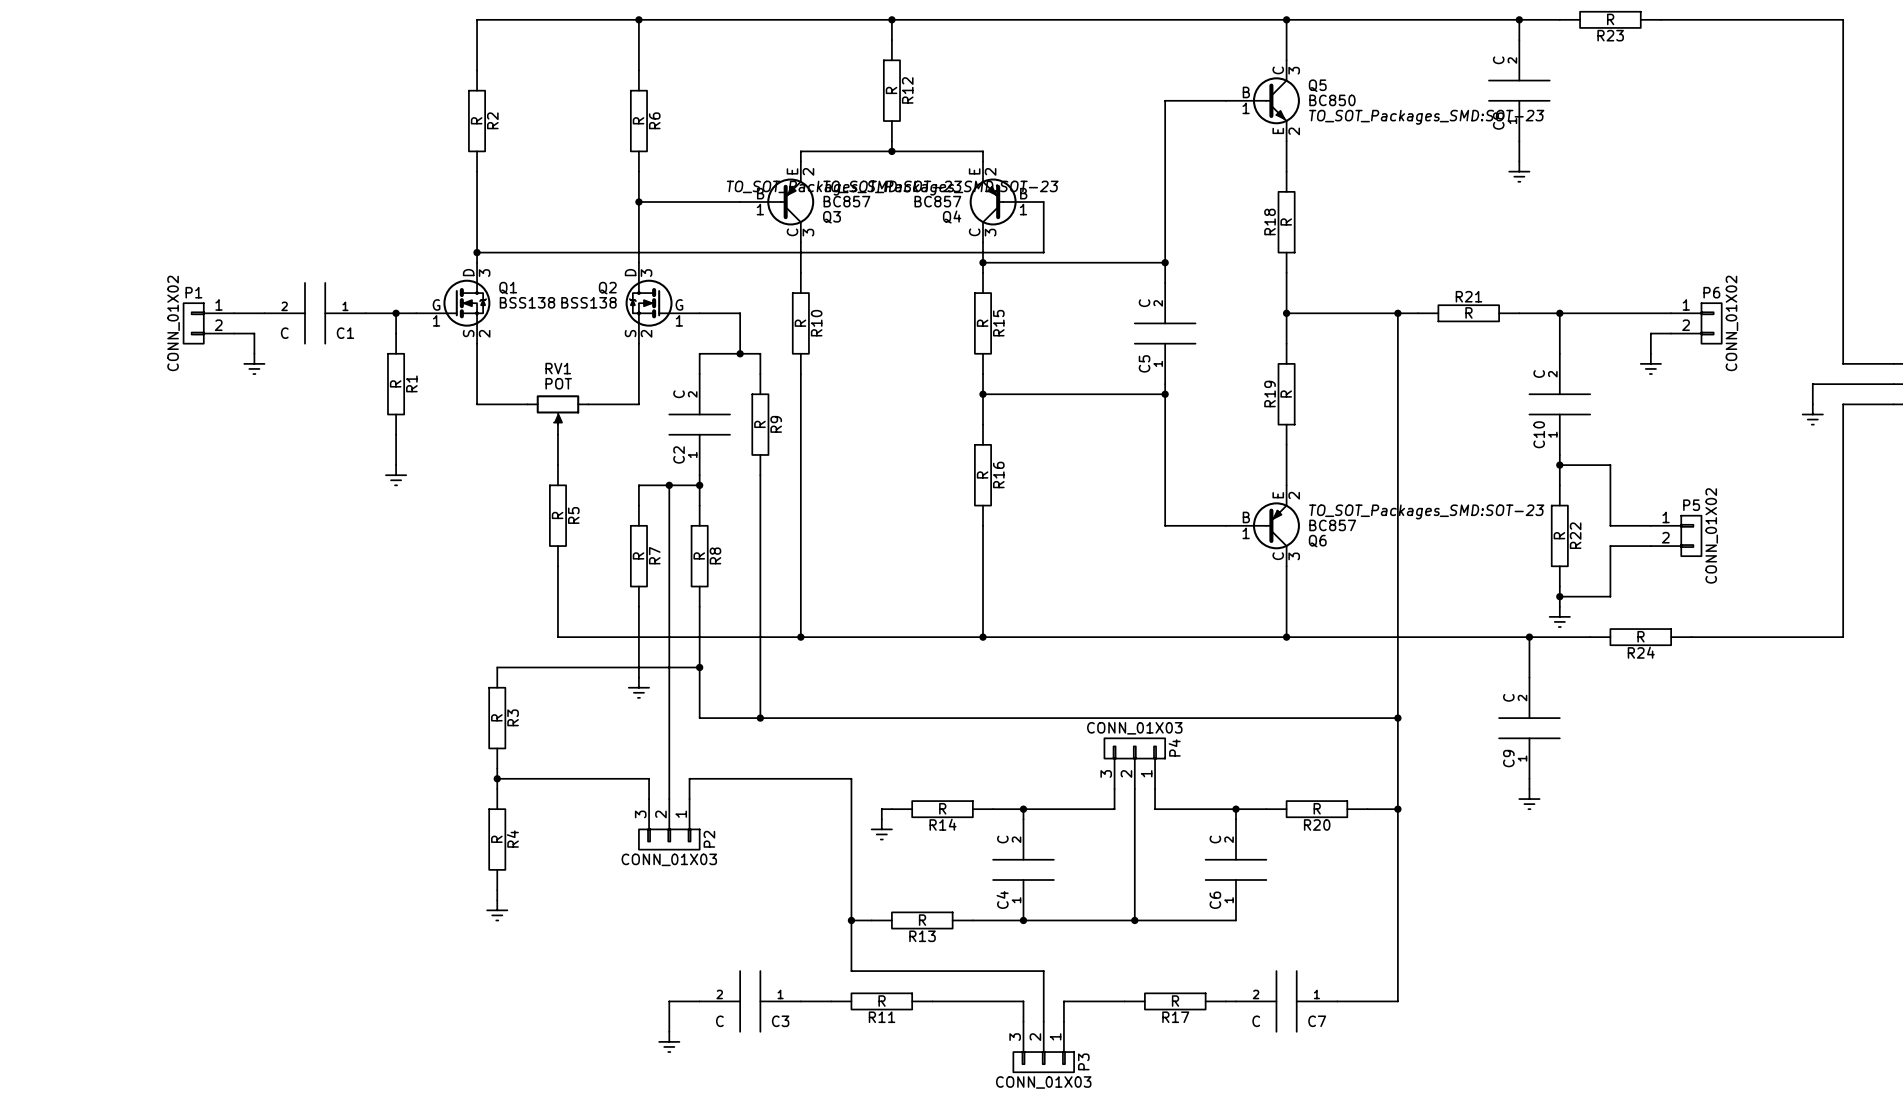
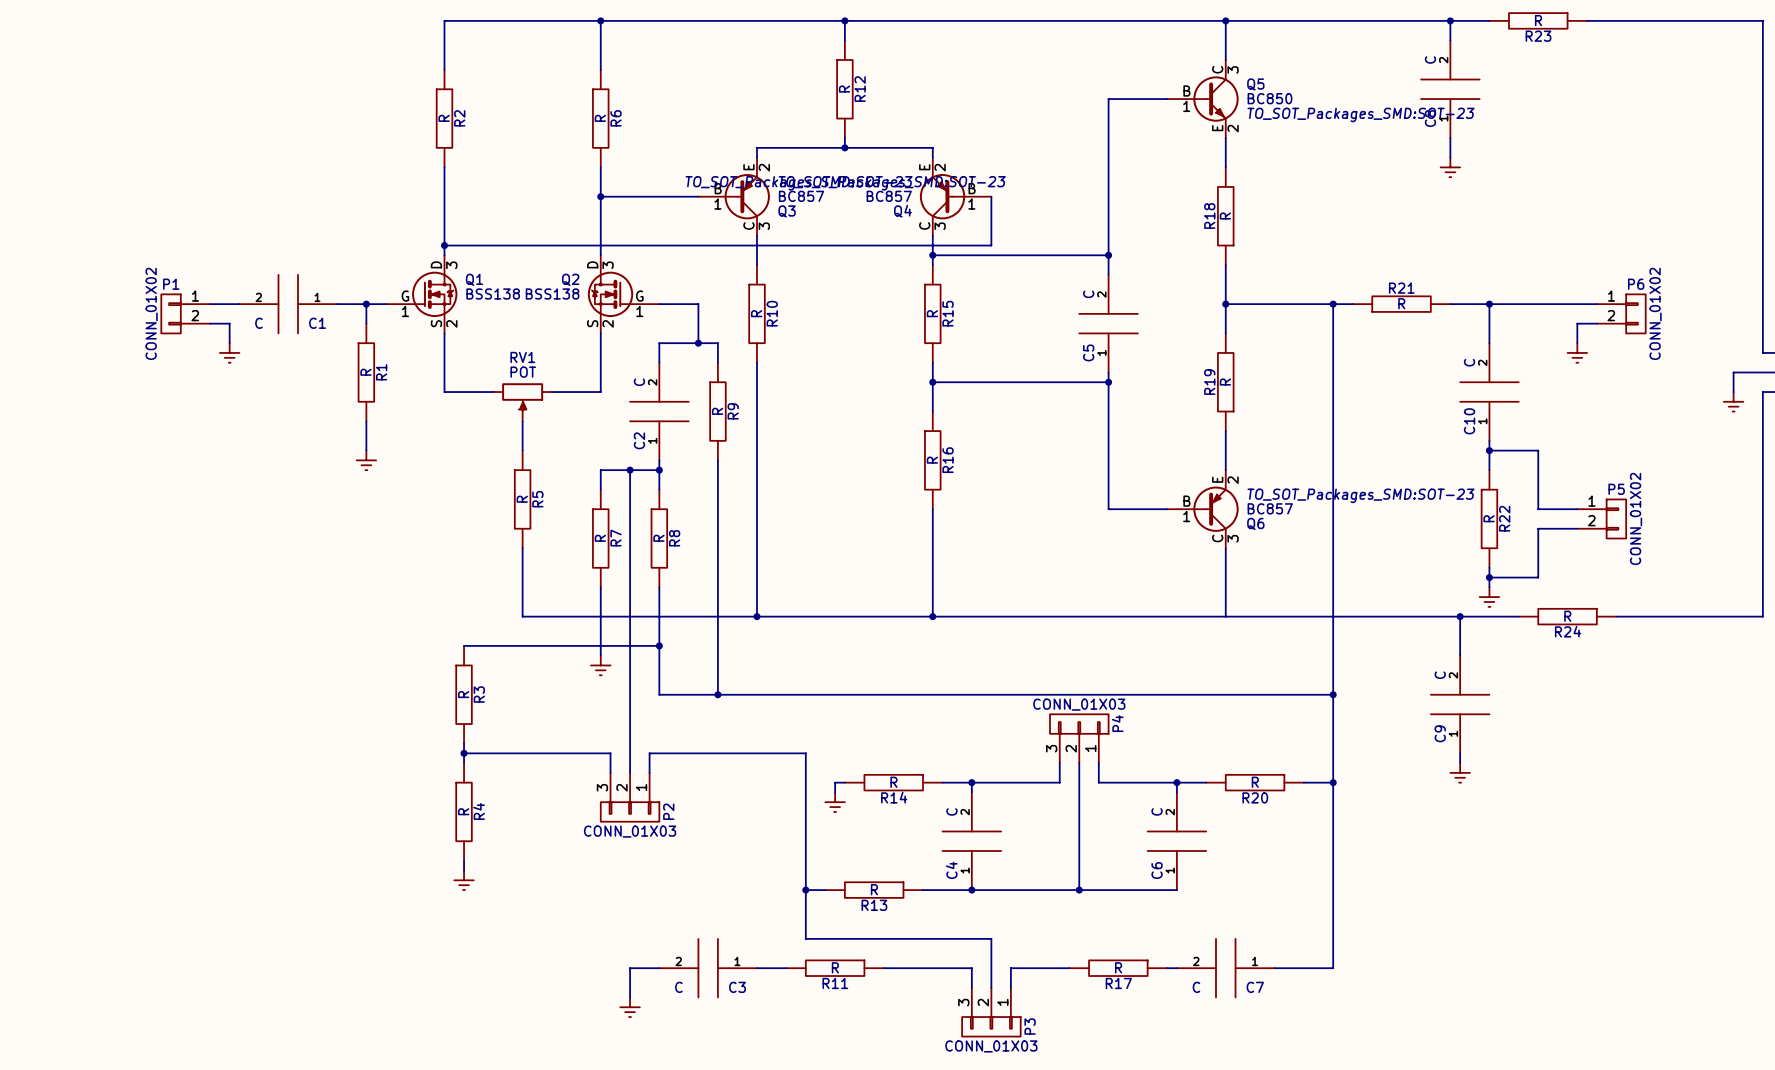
junction: (1286, 637) -> none

